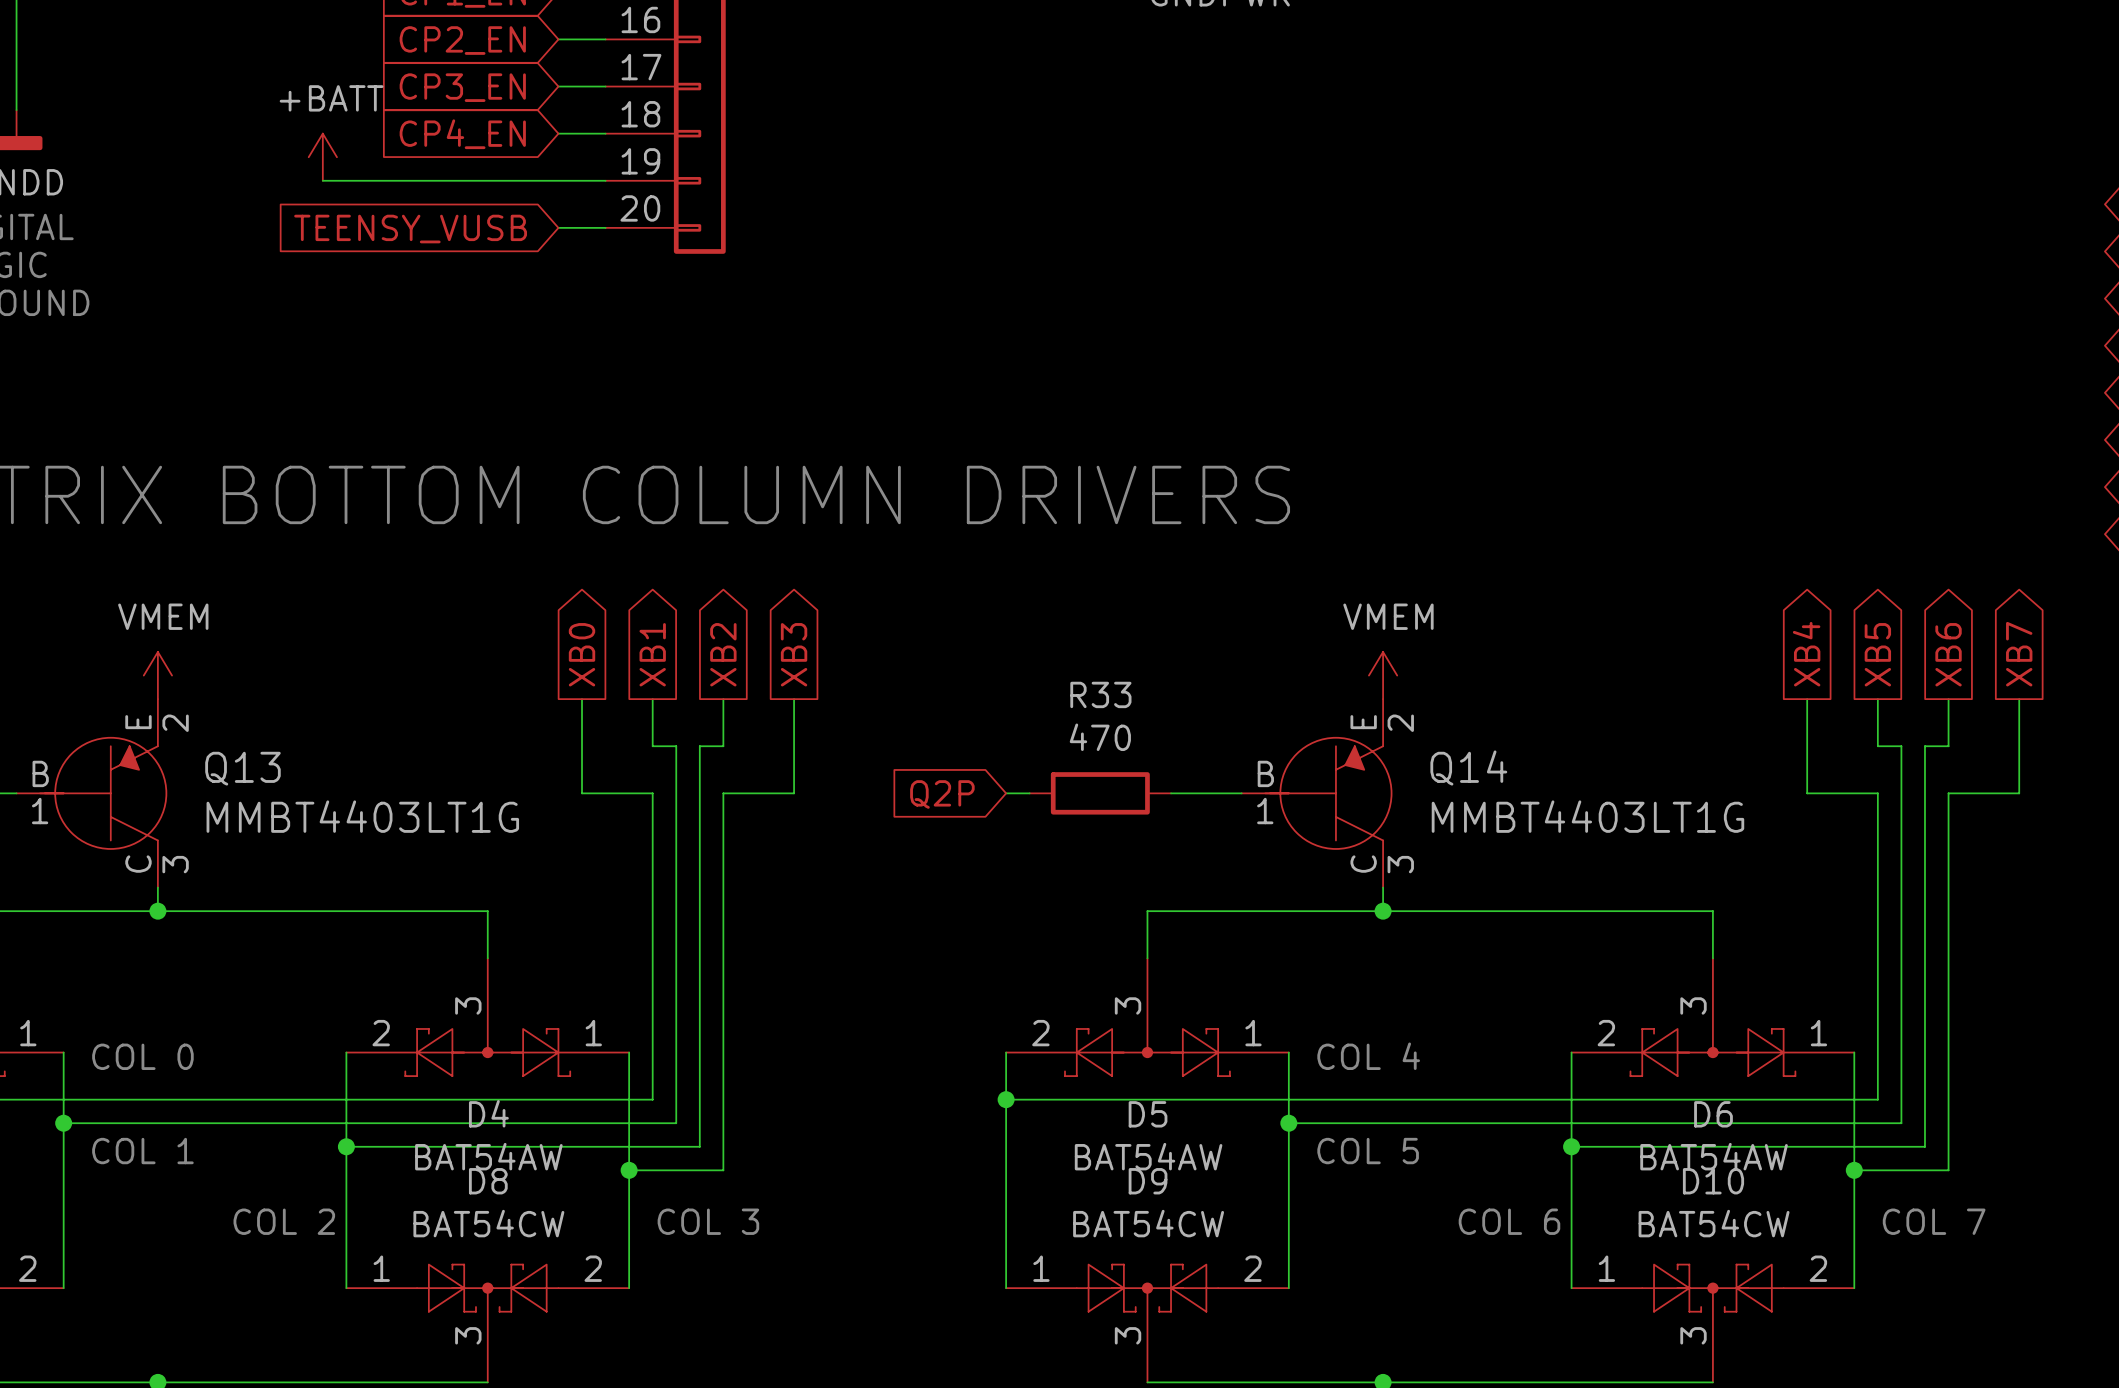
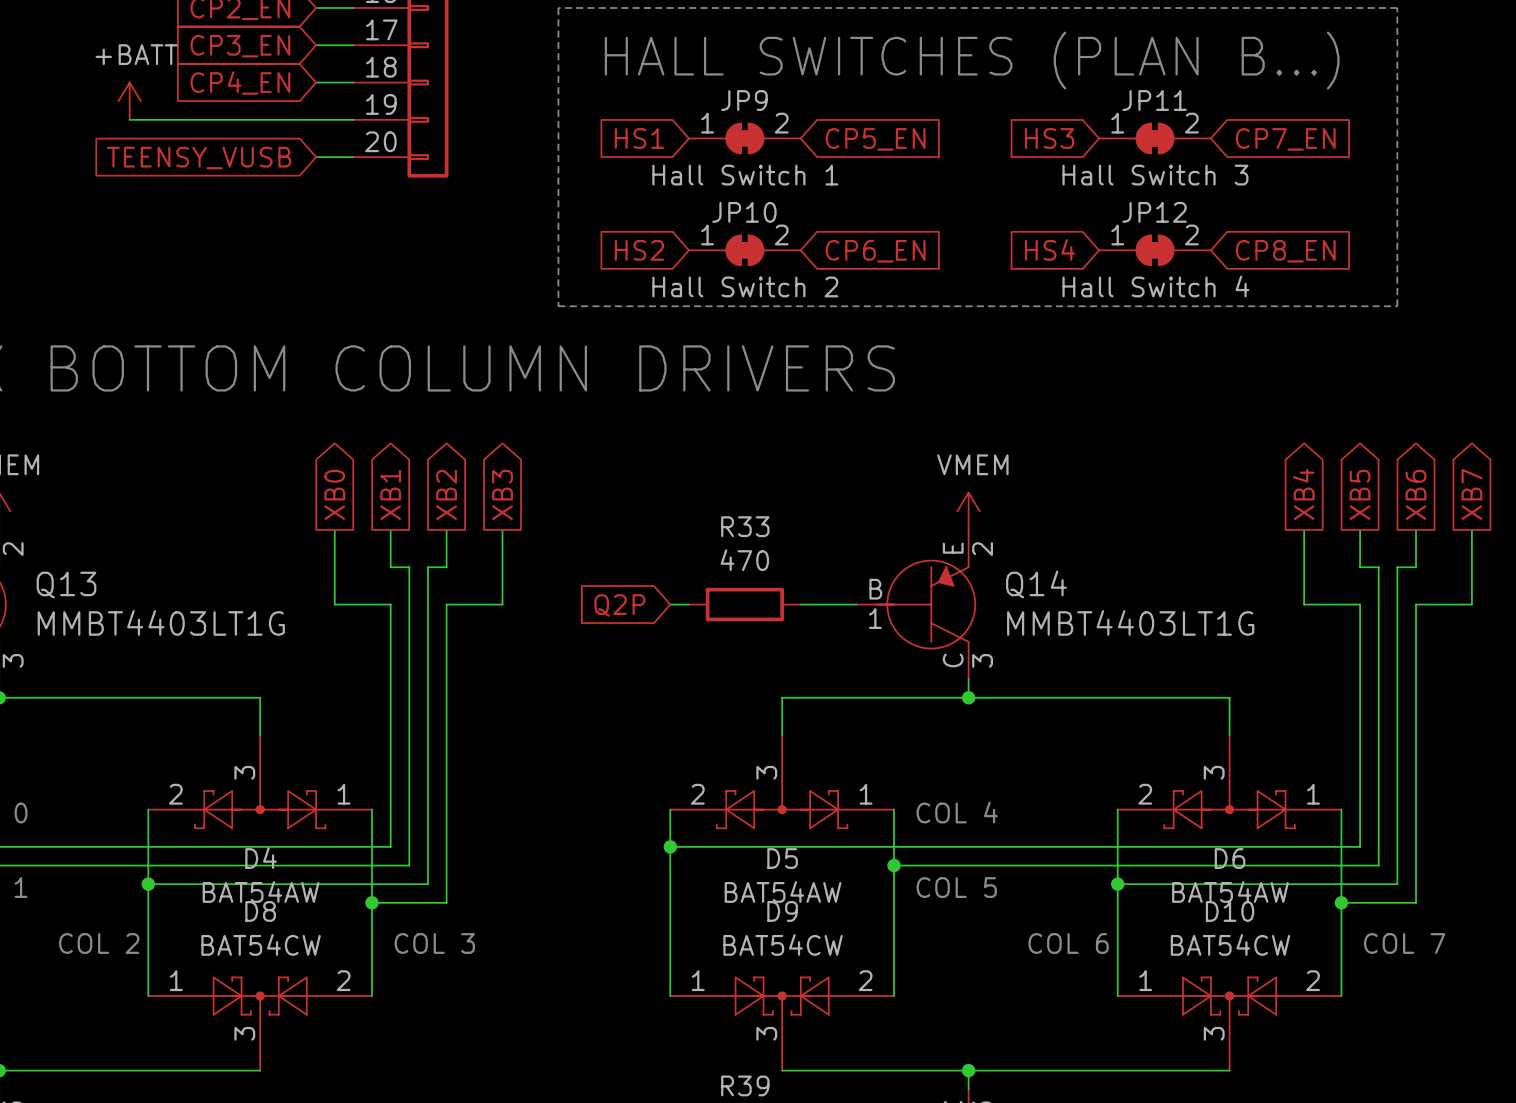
line: none -> (558, 7) (1397, 7) (1397, 306) (558, 306) (558, 7)
text: none -> HALL SWITCHES (PLAN B…) (972, 60)
global label: none -> HS1 (639, 138)
JP9: none -> Hall Switch 1 (744, 138)
global label: none -> HS3 (1049, 138)
JP11: none -> Hall Switch 3 (1155, 138)
global label: none -> CP5_EN (875, 139)
global label: none -> CP7_EN (1285, 139)
global label: none -> HS2 (639, 250)
JP10: none -> Hall Switch 2 (744, 250)
global label: none -> HS4 (1050, 249)
JP12: none -> Hall Switch 4 (1155, 250)
global label: none -> CP6_EN (875, 251)
global label: none -> CP8_EN (1285, 251)

